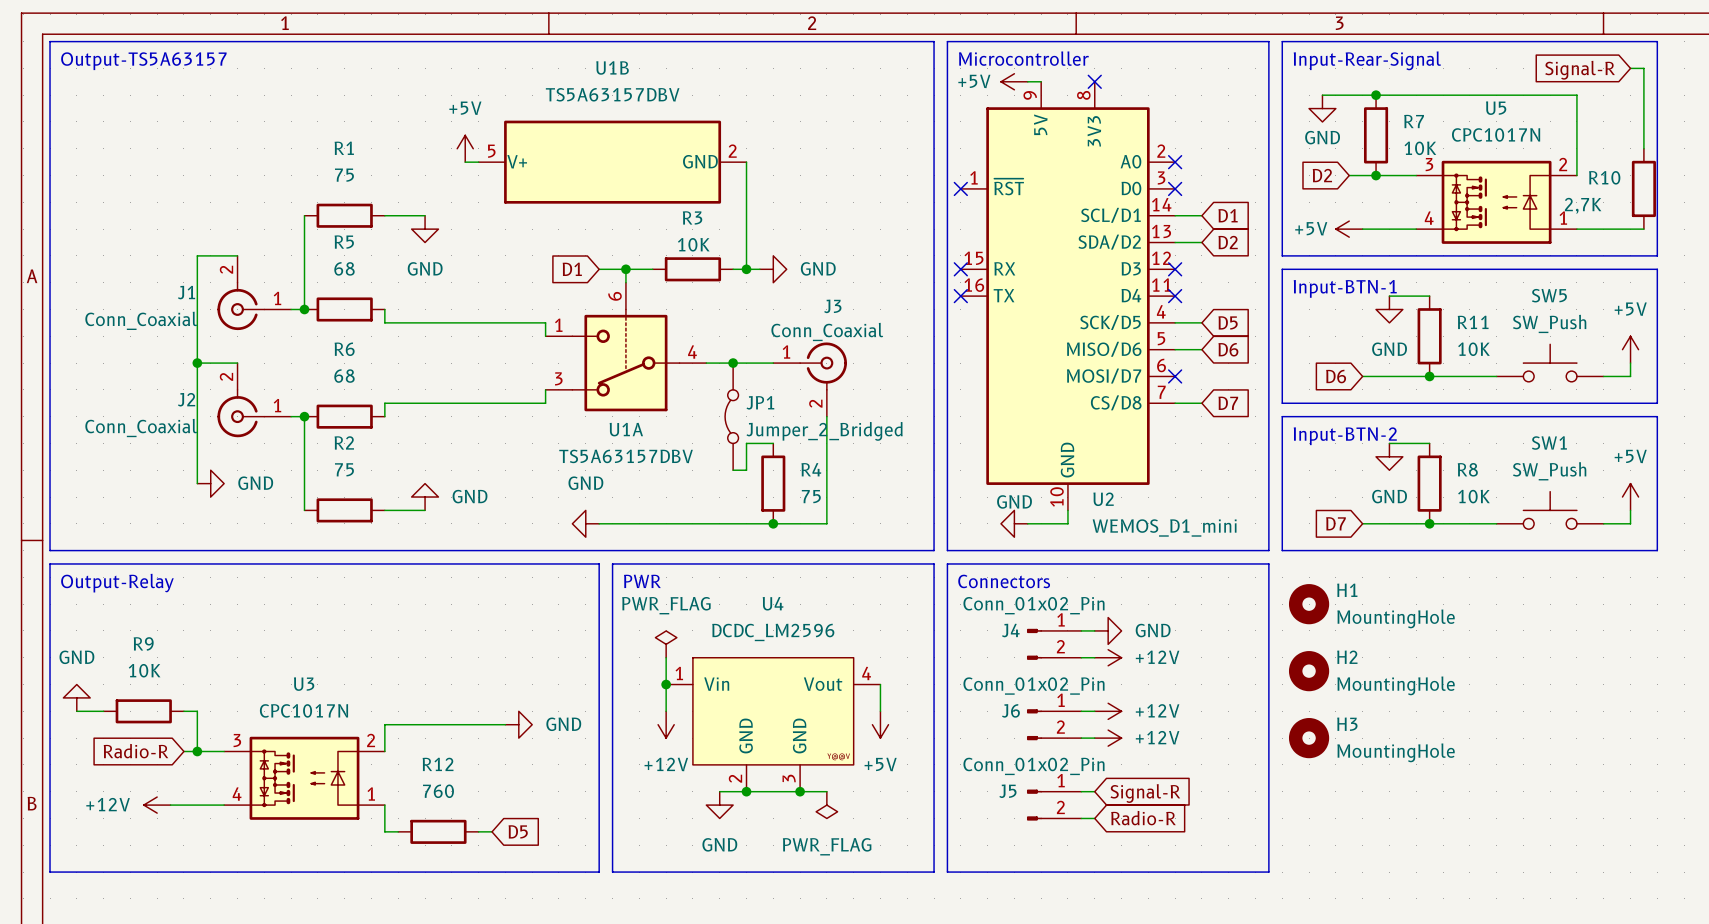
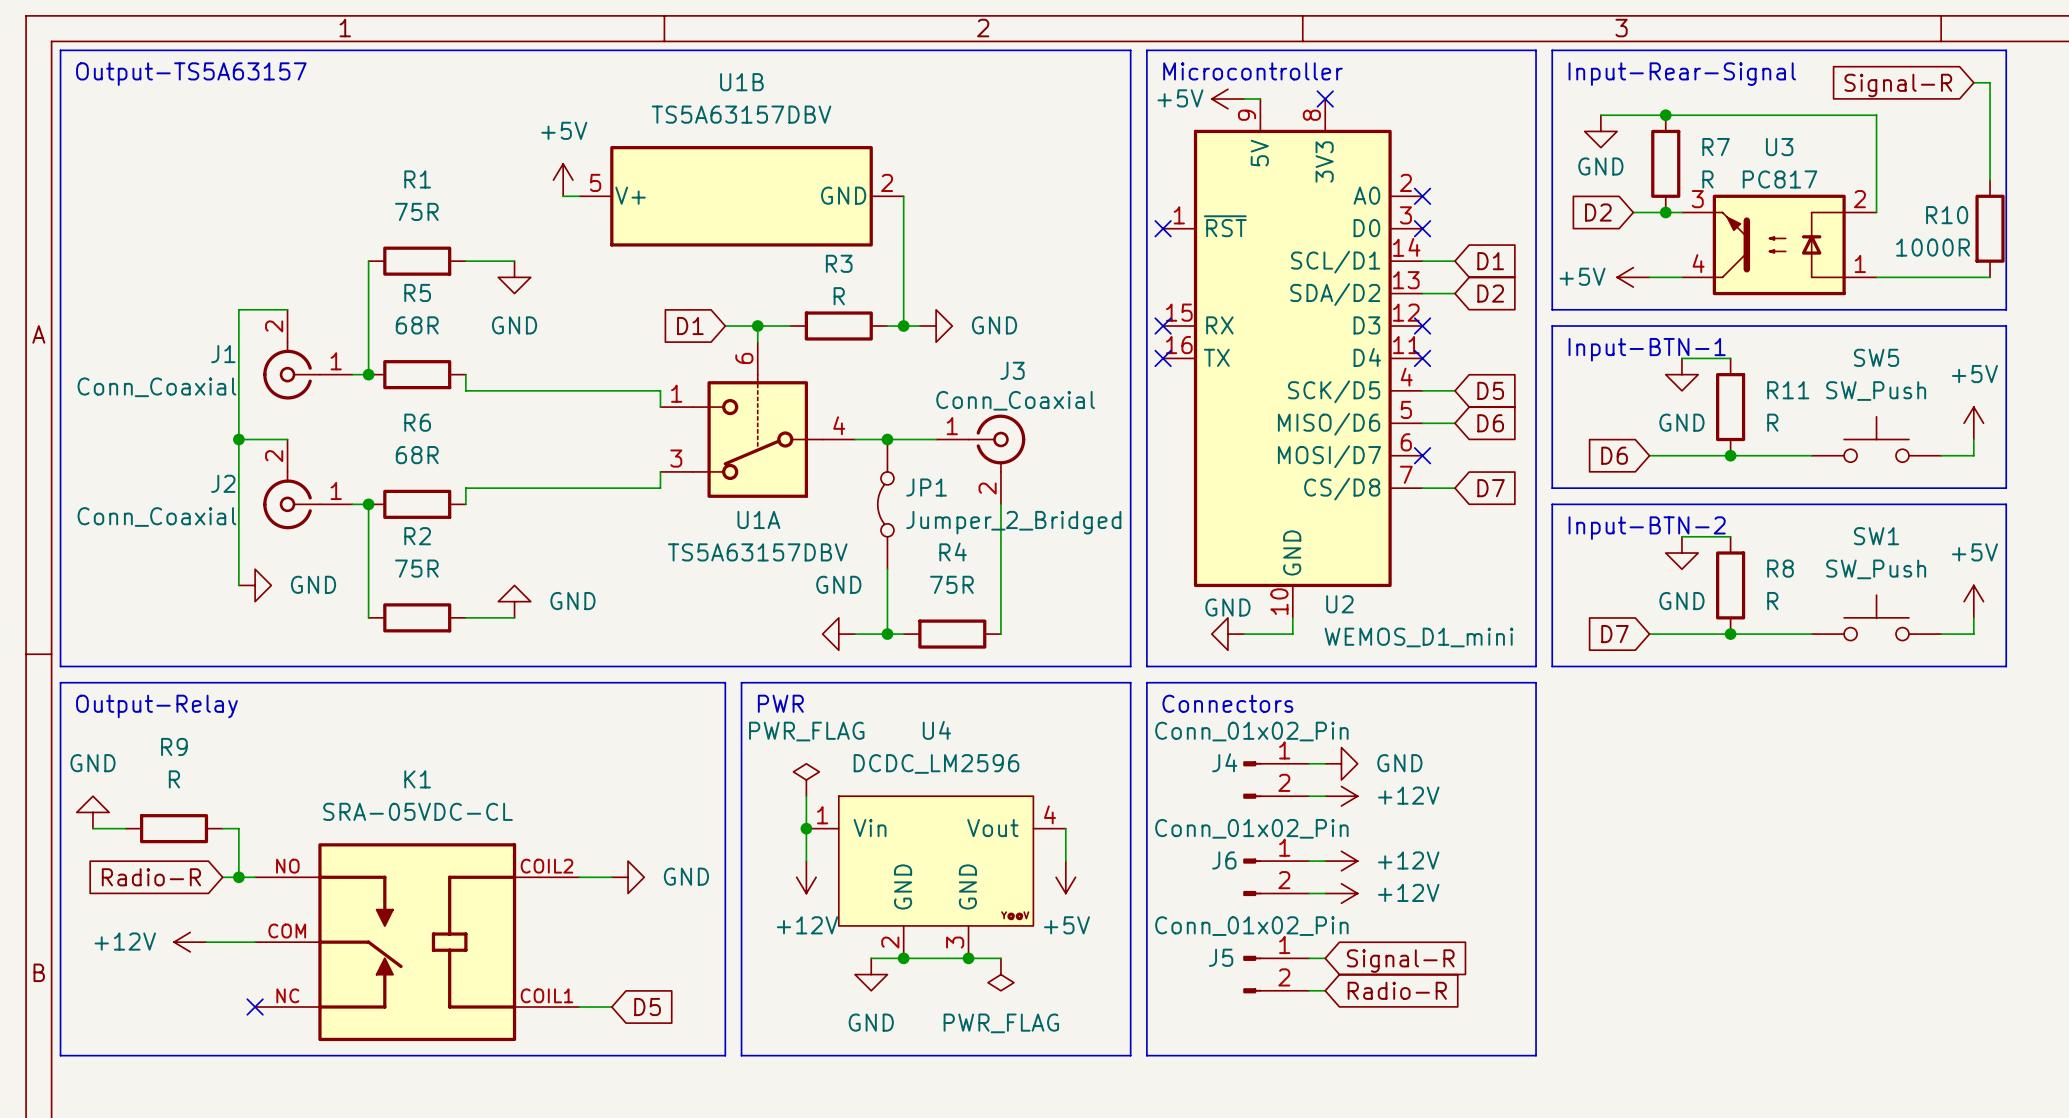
wire: (1550, 95) (1576, 95) (1576, 175) -> (1876, 115) (1876, 212)
R7 value: 10K (1420, 148) -> R (1707, 179)
R1 value: 75 (344, 175) -> 75R (416, 211)
U5: CPC1017N (1496, 202) -> none
R10 value: 2,7K (1583, 205) -> 1000R (1933, 247)
R3 value: 10K (693, 244) -> R (839, 296)
R5 value: 68 (344, 268) -> 68R (417, 325)
R11 value: 10K (1473, 349) -> R (1772, 422)
R6 value: 68 (344, 376) -> 68R (417, 455)
wire: (773, 443) (746, 443) (746, 470) (733, 470) -> (887, 634) (887, 569)
R2 value: 75 (344, 469) -> 75R (416, 568)
R4 name position: R4 (811, 469) -> R4 (953, 552)
R4 rotation: 0° (773, 483) -> 90° clockwise (952, 634)
R4 value: 75 (811, 496) -> 75R (951, 584)
R8 value: 10K (1473, 496) -> R (1772, 601)
power symbol position: GND (585, 523) -> GND (838, 634)
wire: (599, 523) (706, 523) -> none
wire: (746, 523) (826, 523) -> none
junction position: (773, 523) -> (887, 634)
H1: MountingHole (1309, 604) -> none
R9 value: 10K (144, 670) -> R (174, 779)
H2: MountingHole (1309, 671) -> none
power symbol position: GND (76, 697) -> GND (92, 812)
U3 value: CPC1017N (303, 710) -> PC817 (1780, 179)
wire: (76, 711) (103, 711) -> (92, 828) (125, 828)
R9 position: (143, 711) -> (174, 828)
wire: (183, 711) (197, 711) -> (222, 828) (238, 828) (238, 861)
wire: none -> (222, 877) (255, 877)
wire: (197, 724) (197, 751) -> none
U3 symbol: [224, 736, 385, 820] -> [1681, 194, 1877, 296]
H3: MountingHole (1309, 738) -> none
global label position: Radio-R (136, 751) -> Radio-R (151, 877)
wire: (183, 751) (224, 751) -> (206, 942) (255, 942)
junction position: (197, 751) -> (238, 877)
K1: none -> SRA-05VDC-CL (417, 942)
power symbol position: +12V (157, 805) -> +12V (190, 942)
wire: (170, 805) (224, 805) -> none
no-connect mark: none -> (255, 1007)
R12: 760 (438, 831) -> none
wire: none -> (595, 1007) (611, 1007)
global label position: D5 (518, 831) -> D5 (647, 1007)

